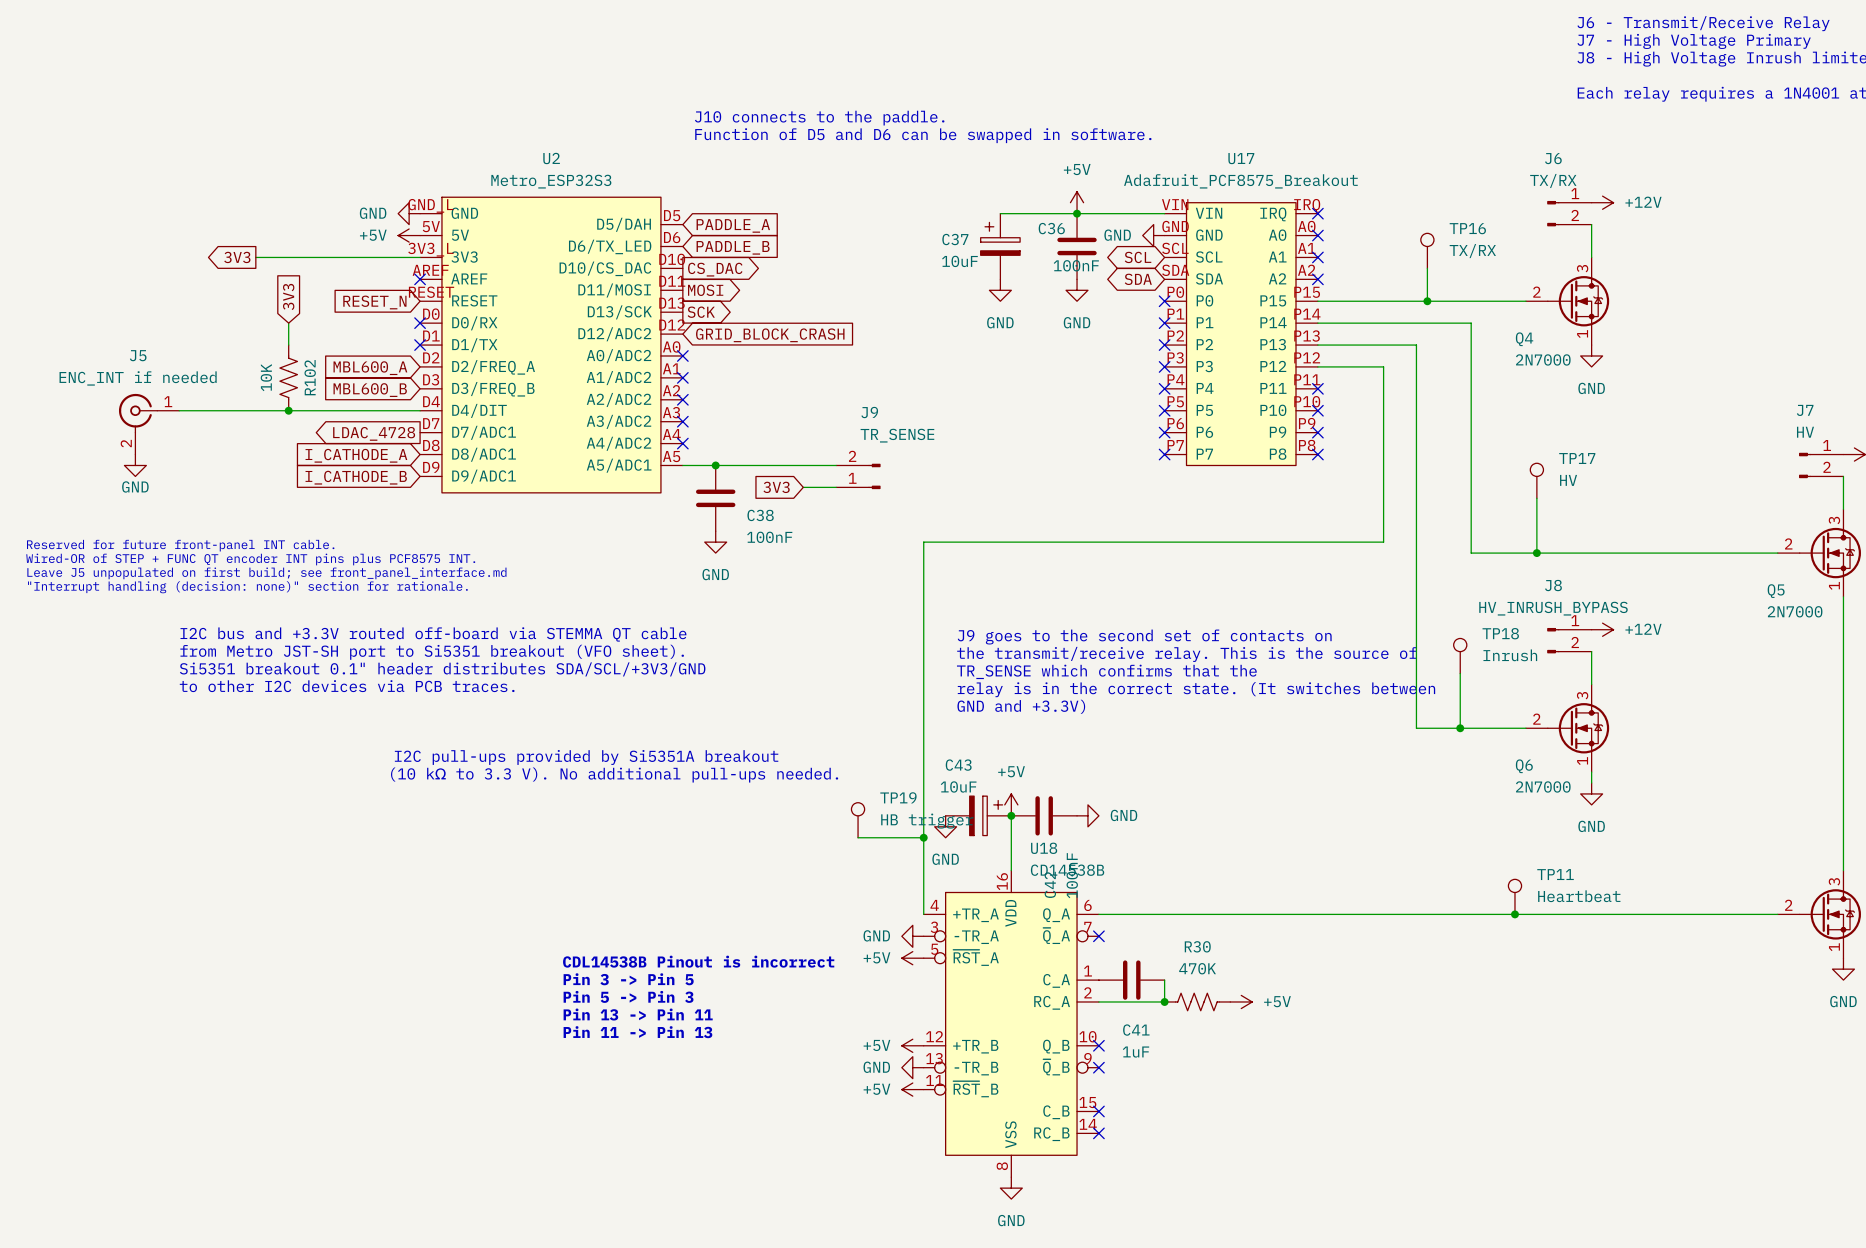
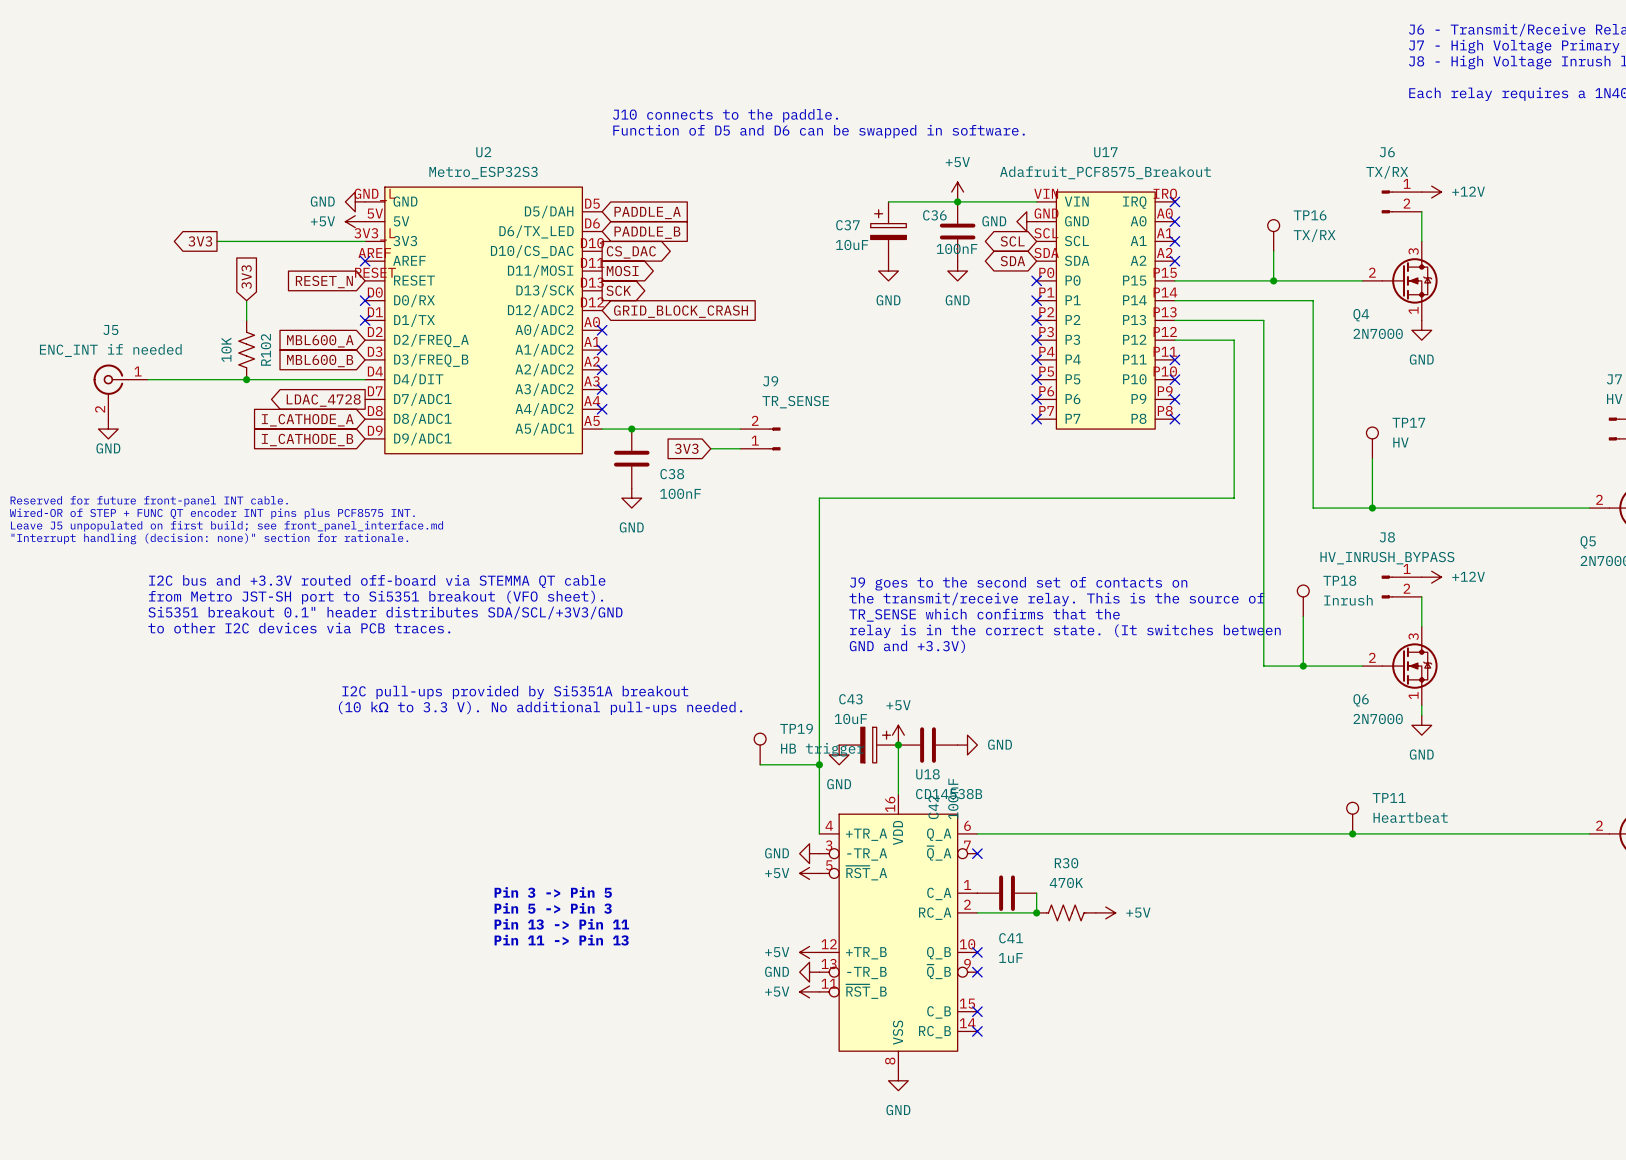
text: CDL14538B Pinout is incorrect (698, 961) -> none

